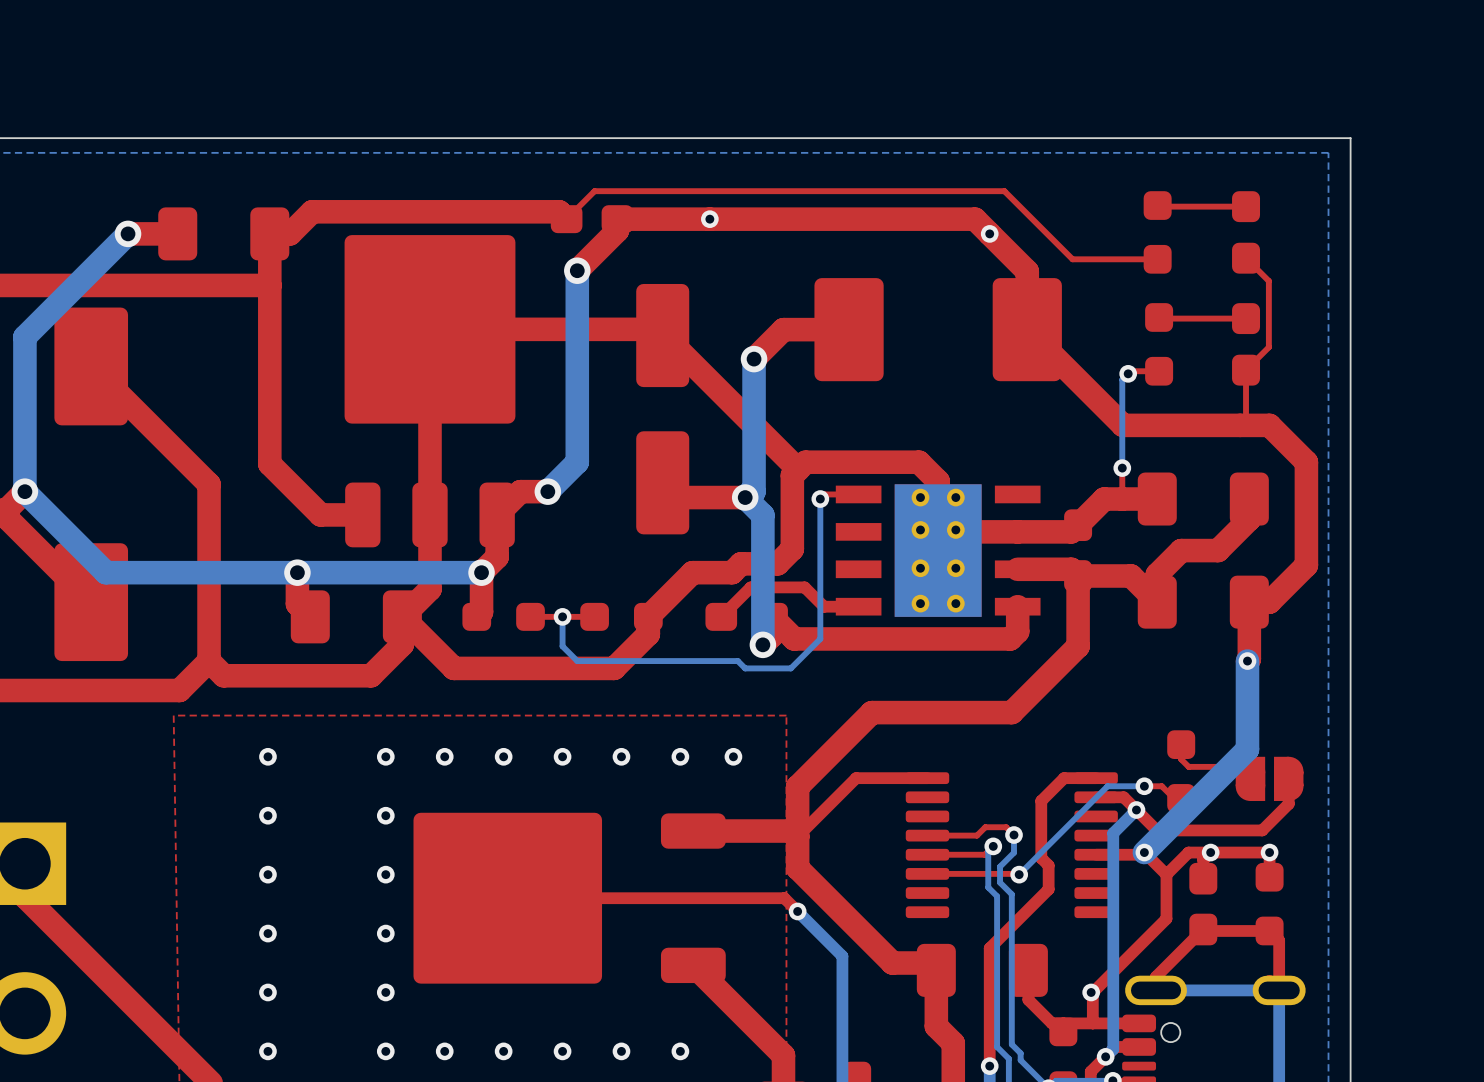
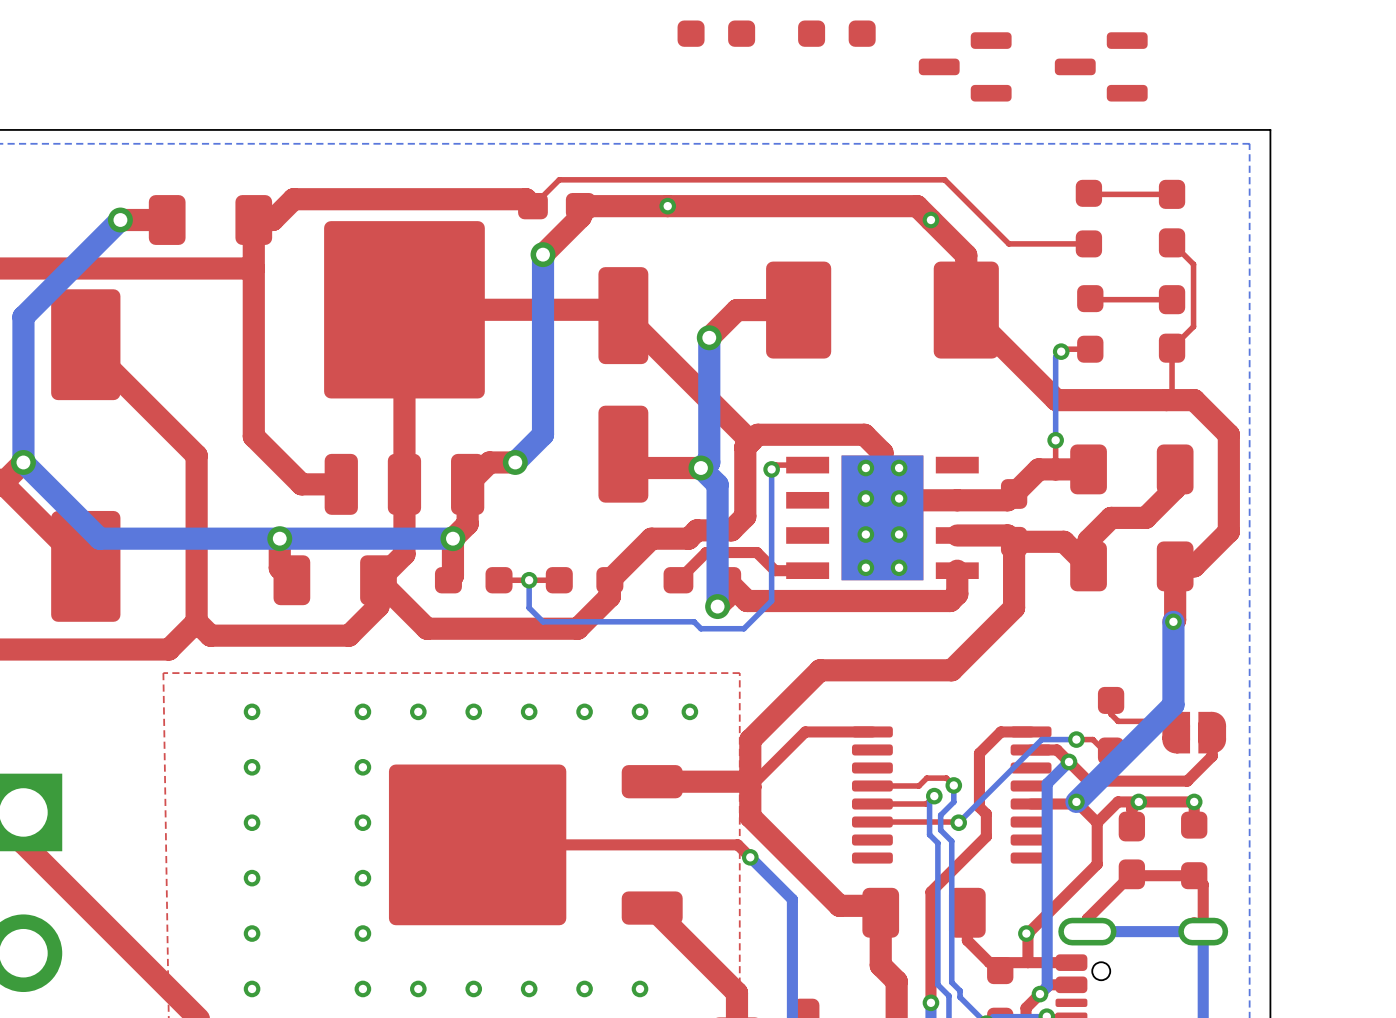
part: none -> (716, 33)
part: none -> (836, 33)
part: none -> (965, 66)
part: none -> (1101, 66)

